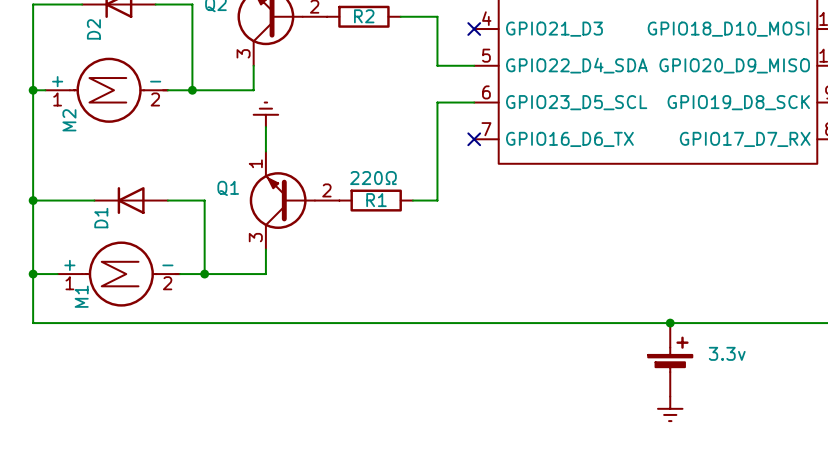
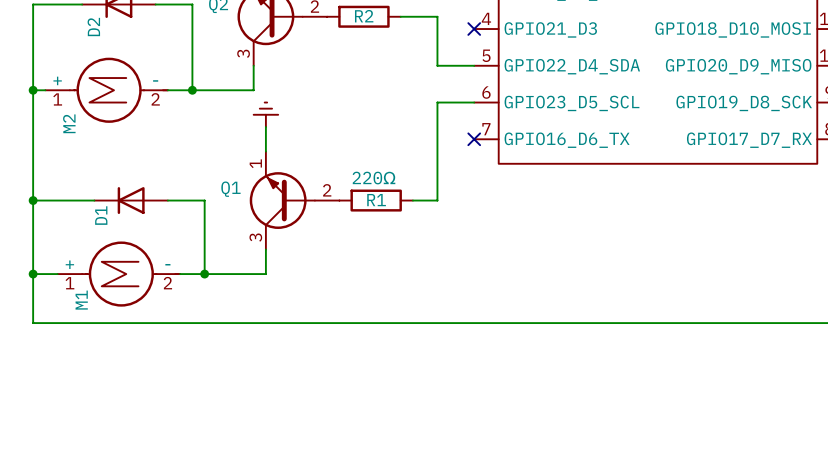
junction: (670, 323) -> none
part: 3.3v (670, 359) -> none
power symbol: (670, 408) -> none

